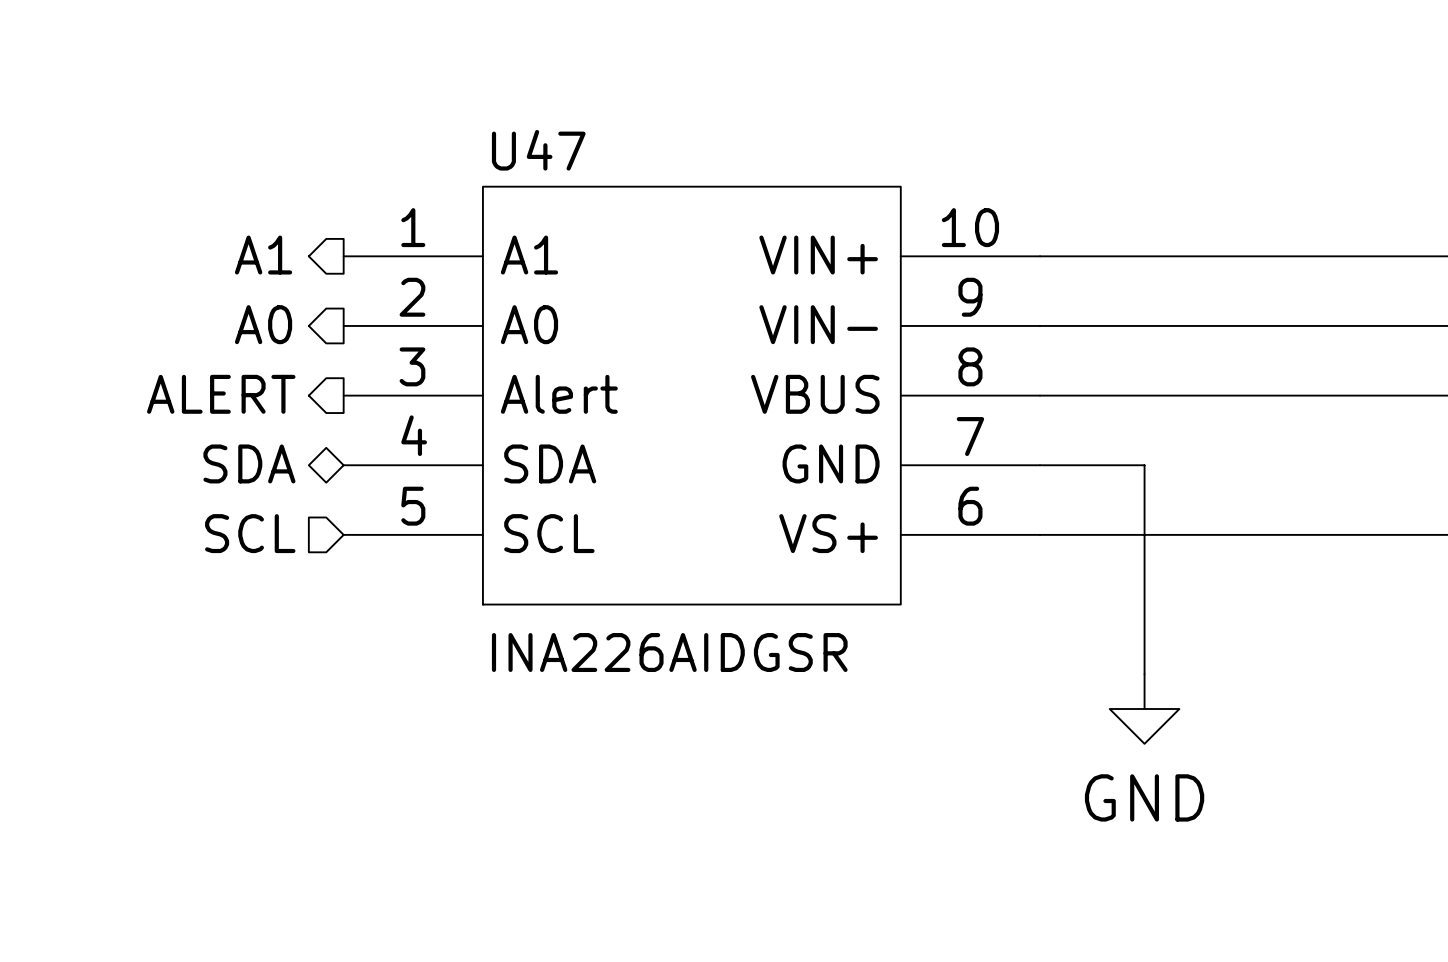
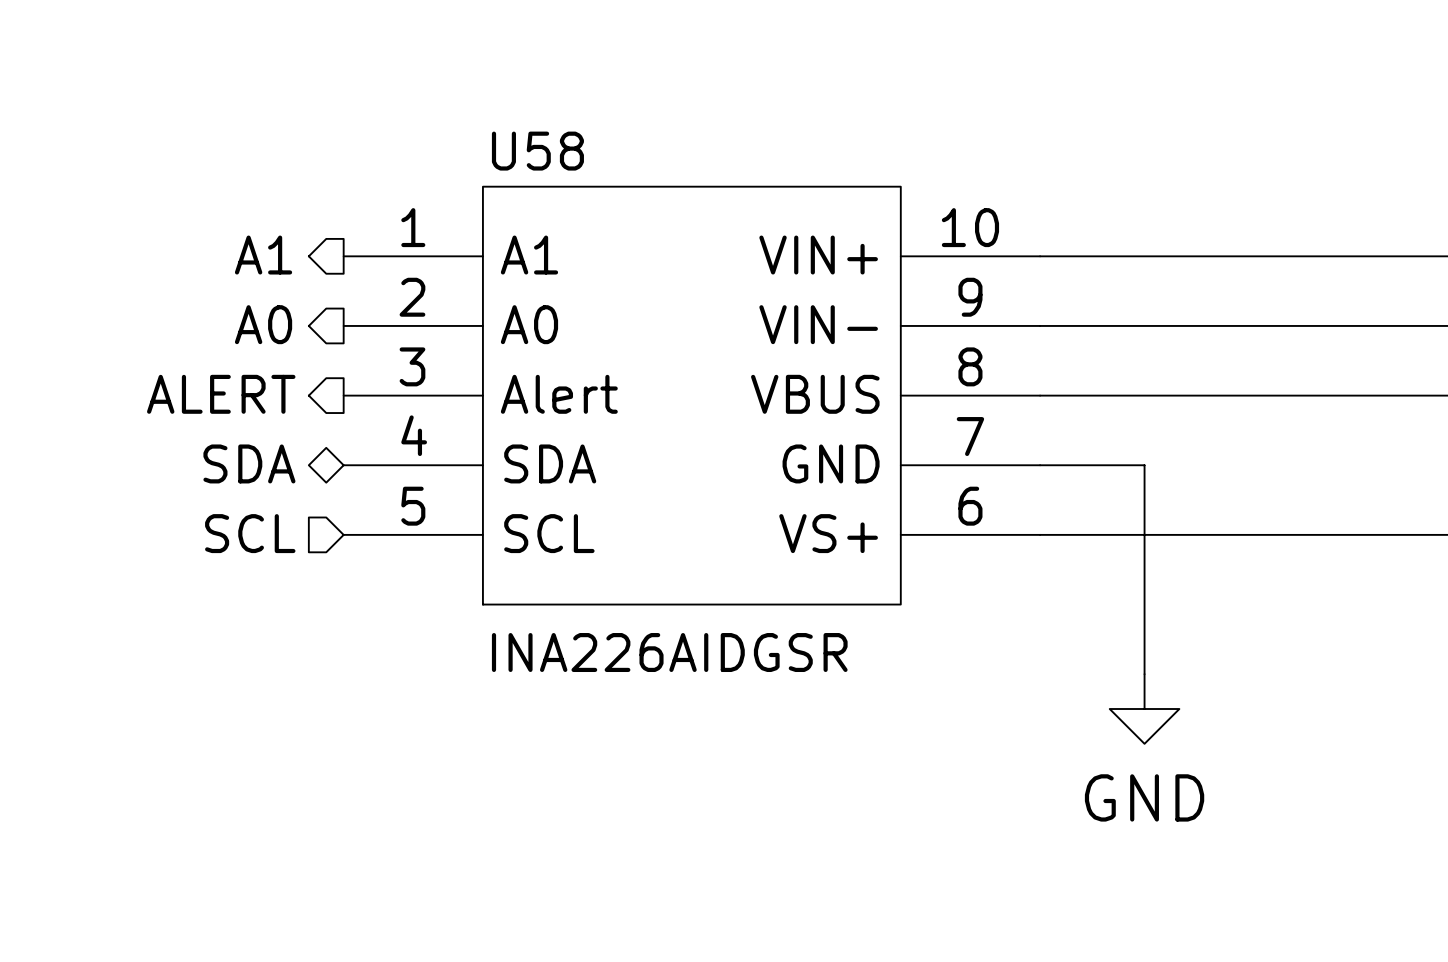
U47 name: U47 (538, 150) -> U58 (537, 151)

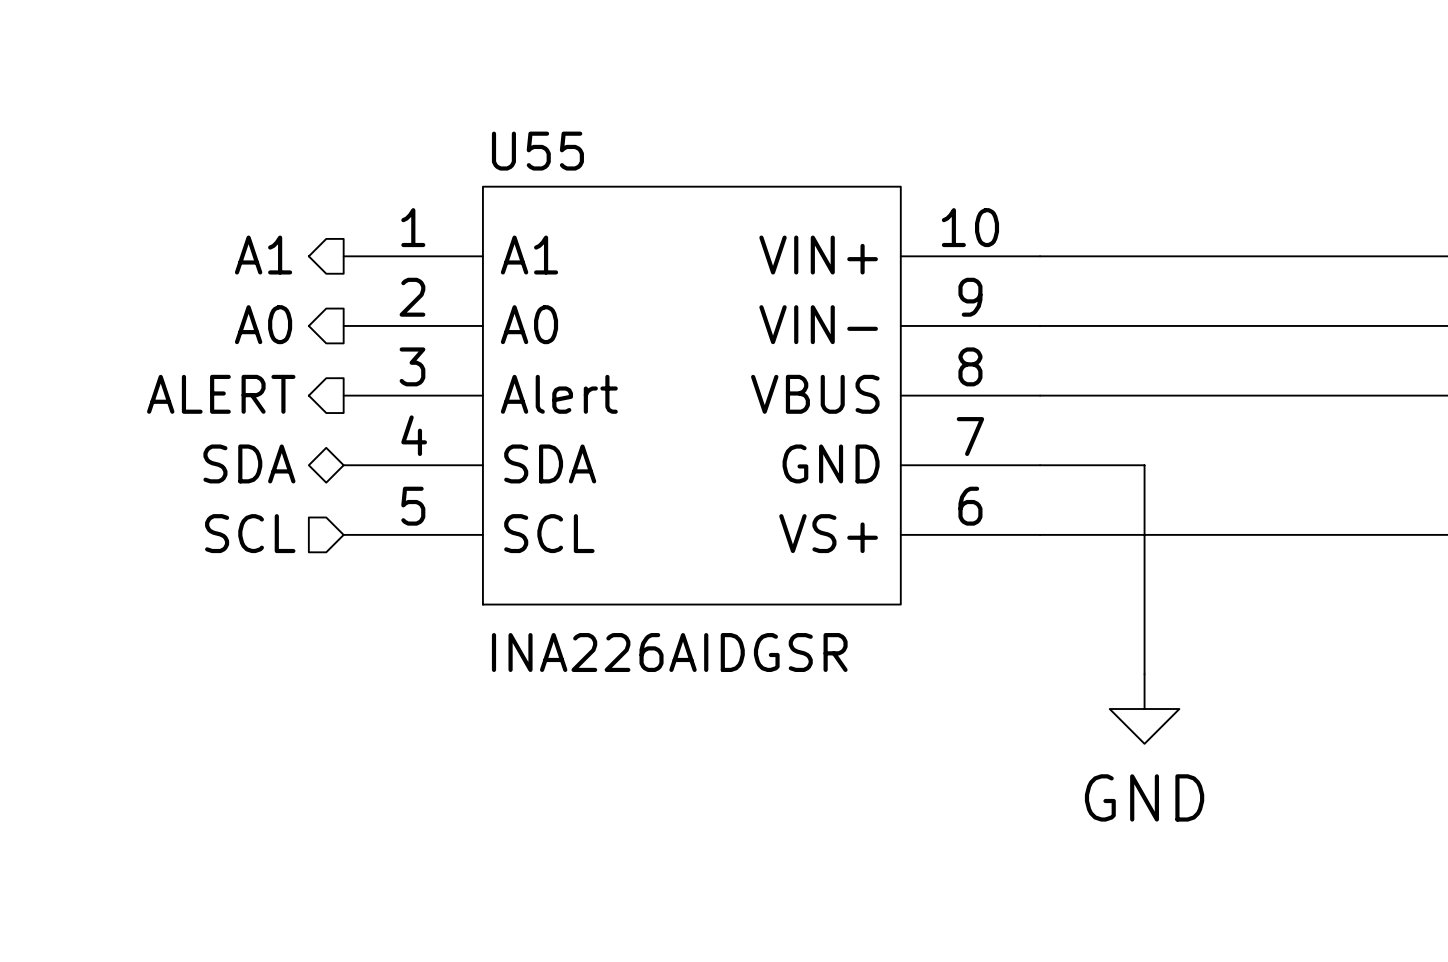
U58 name: U58 (537, 151) -> U55 (537, 151)

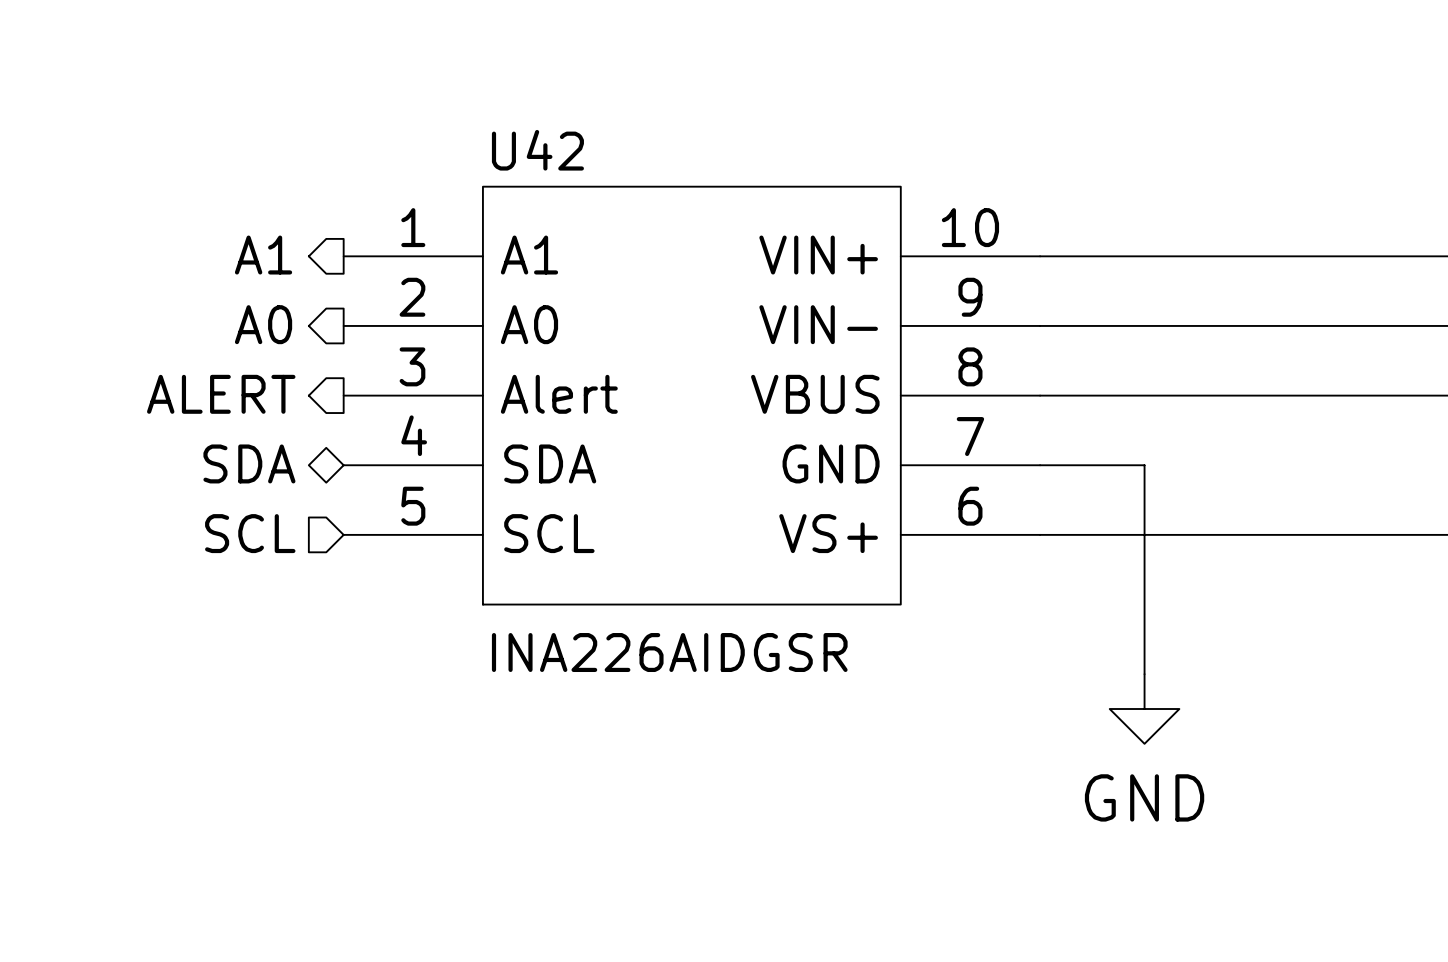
U55 name: U55 (537, 151) -> U42 (537, 150)

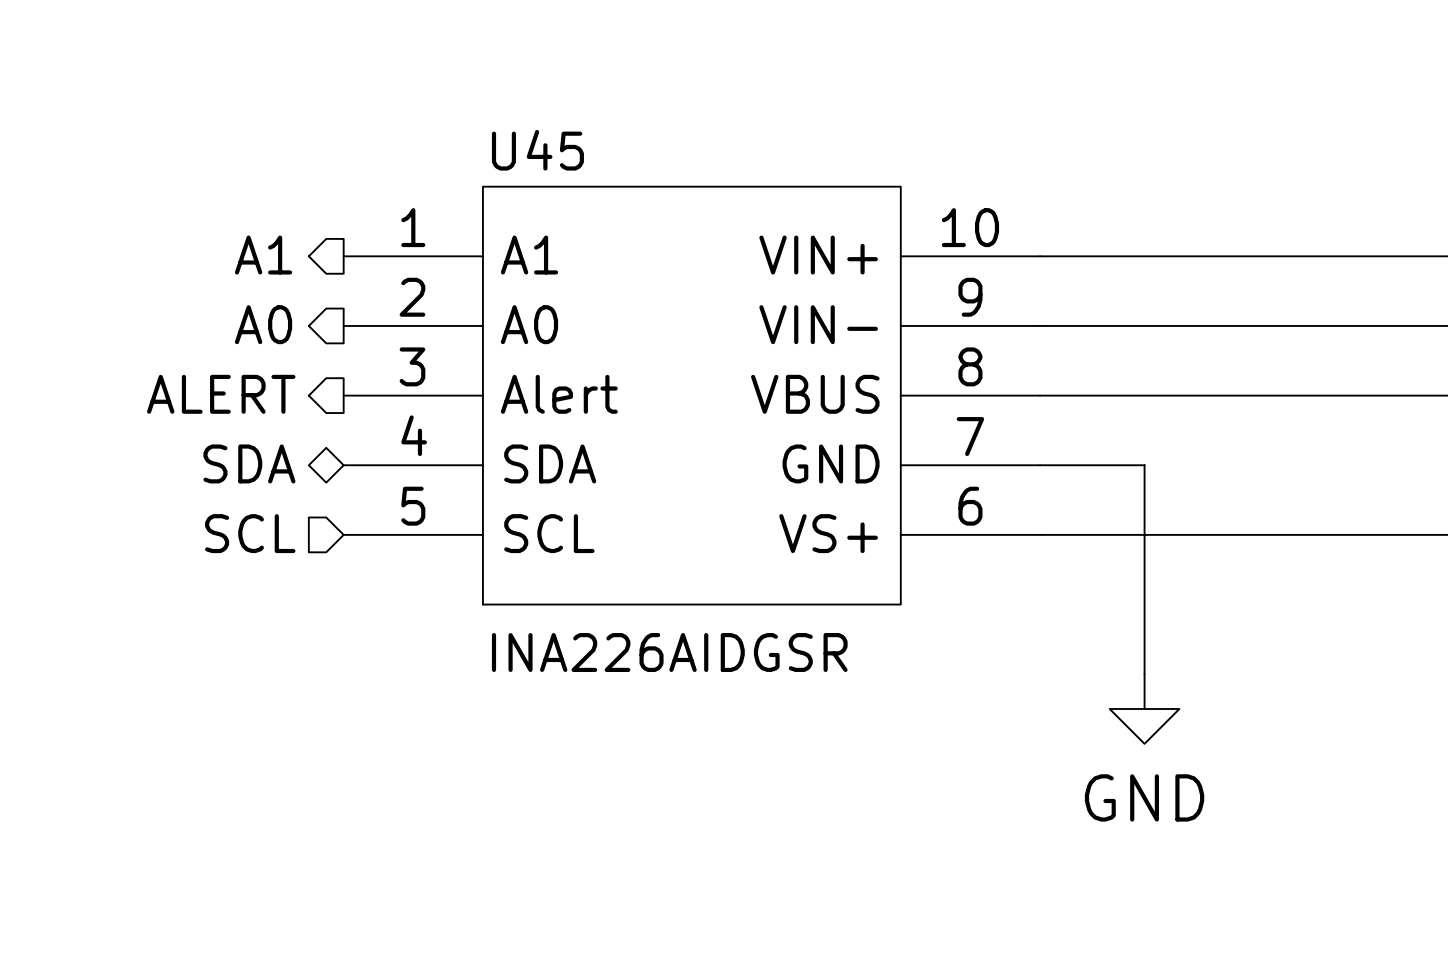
U42 name: U42 (537, 150) -> U45 (537, 150)

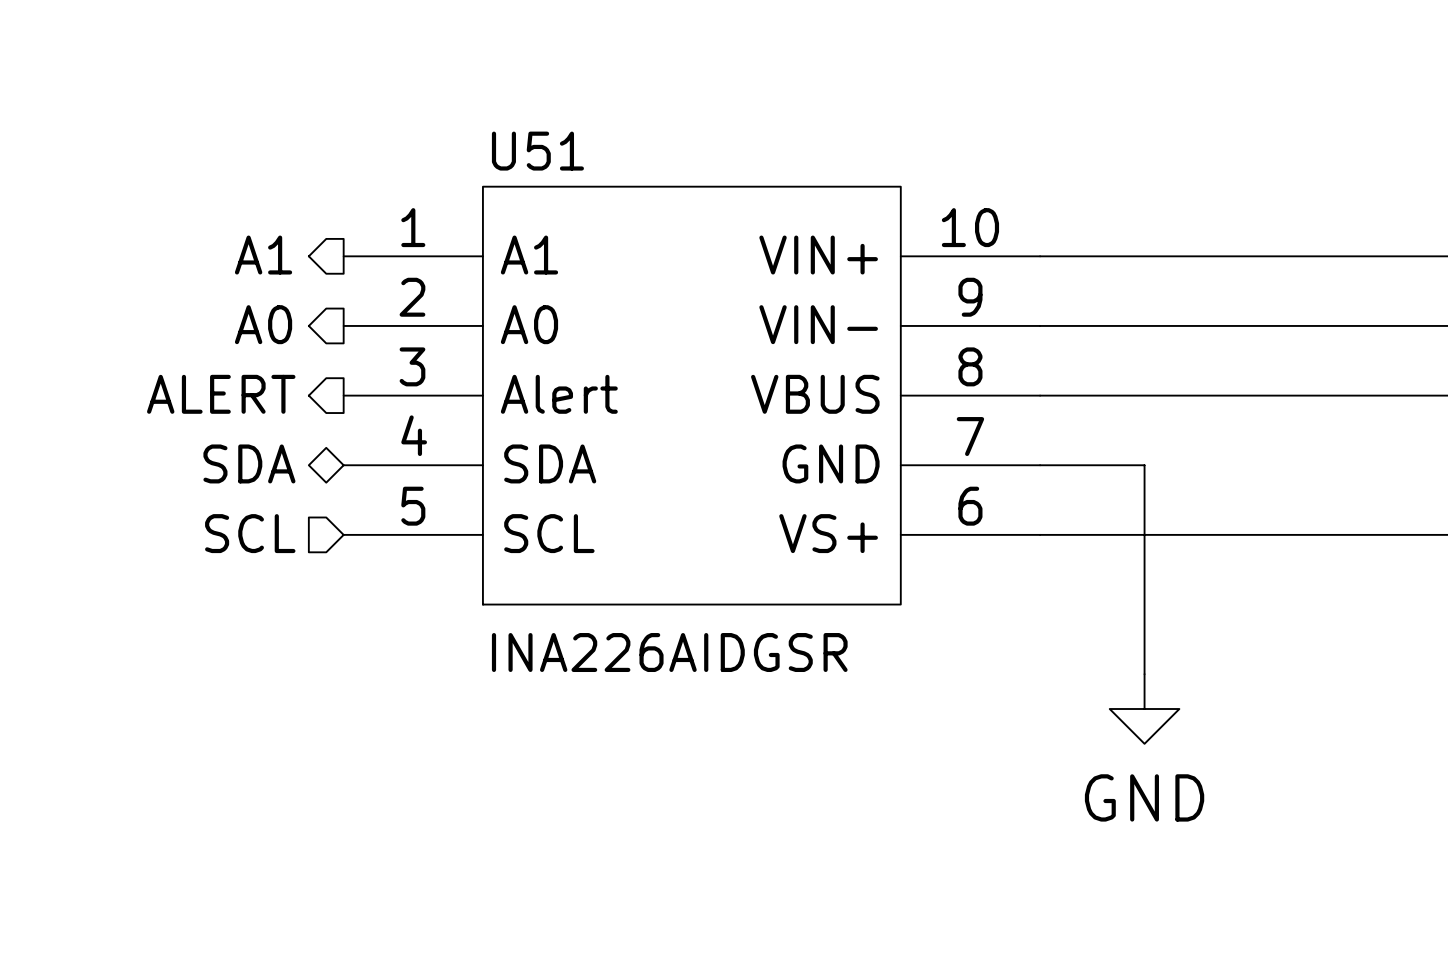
U45 name: U45 (537, 150) -> U51 (537, 151)

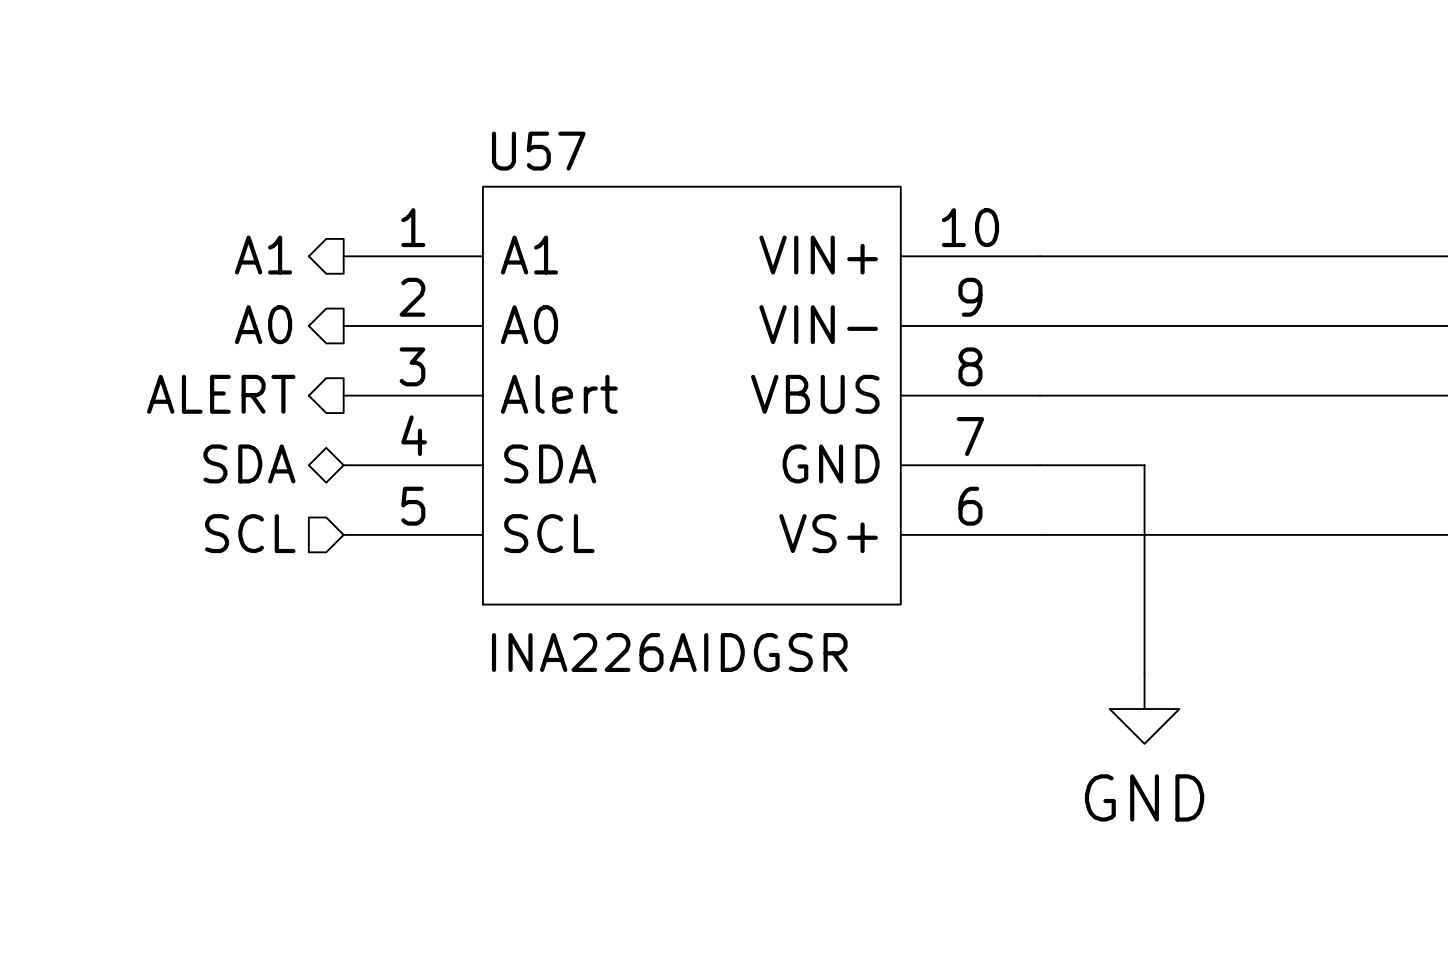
U51 name: U51 (537, 151) -> U57 (538, 151)

